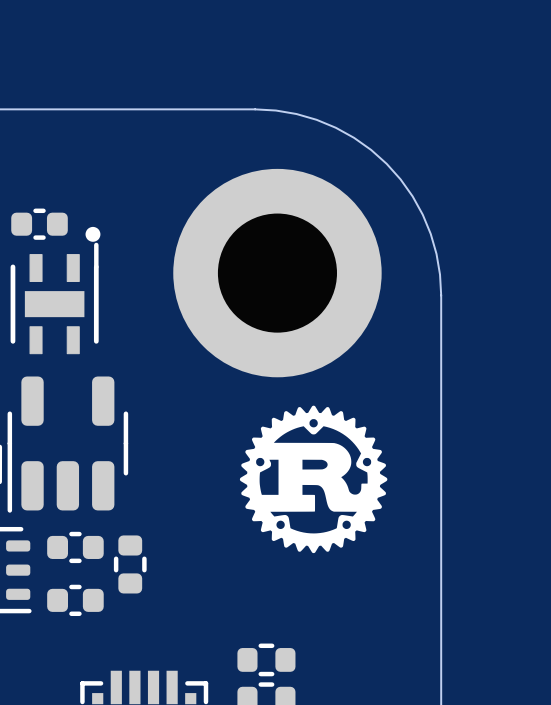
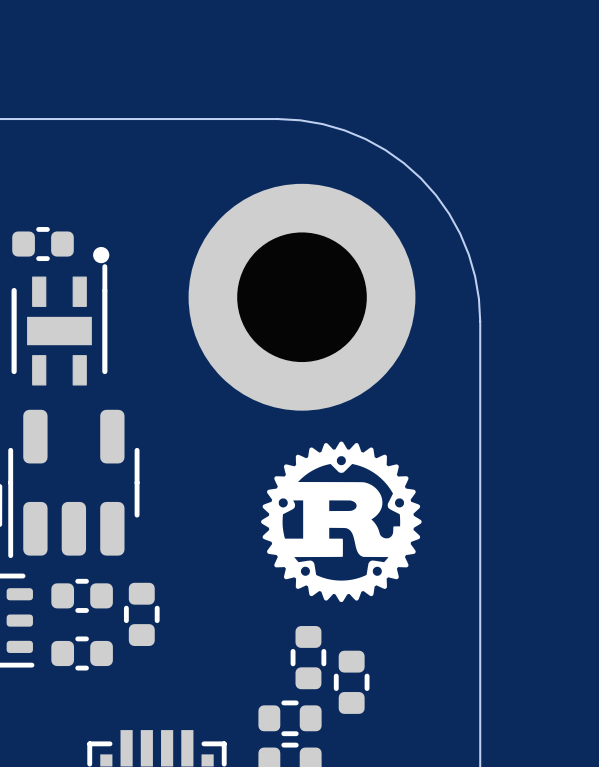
part: none -> (308, 657)
part: none -> (351, 682)

